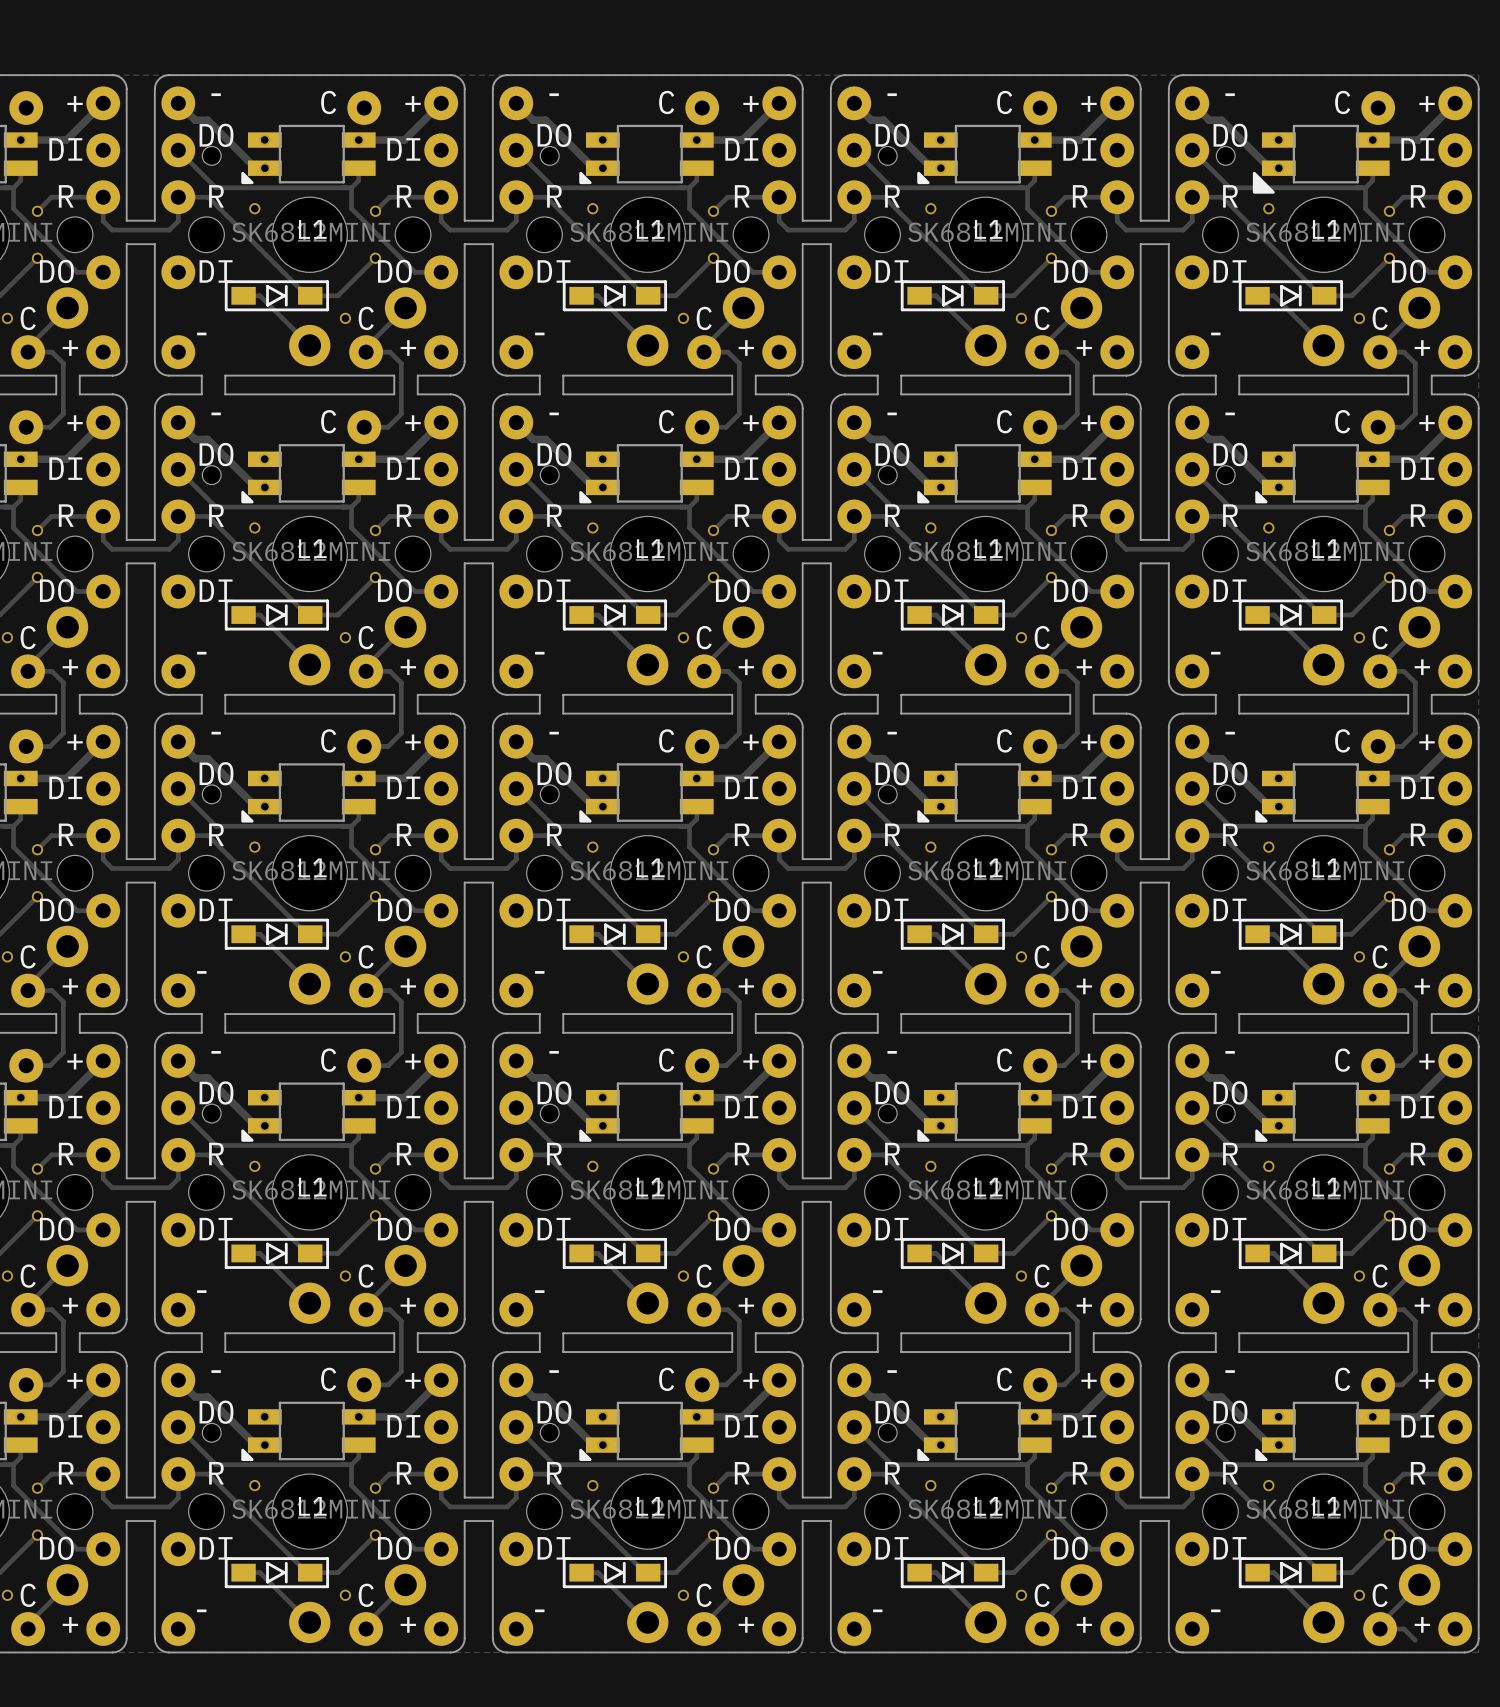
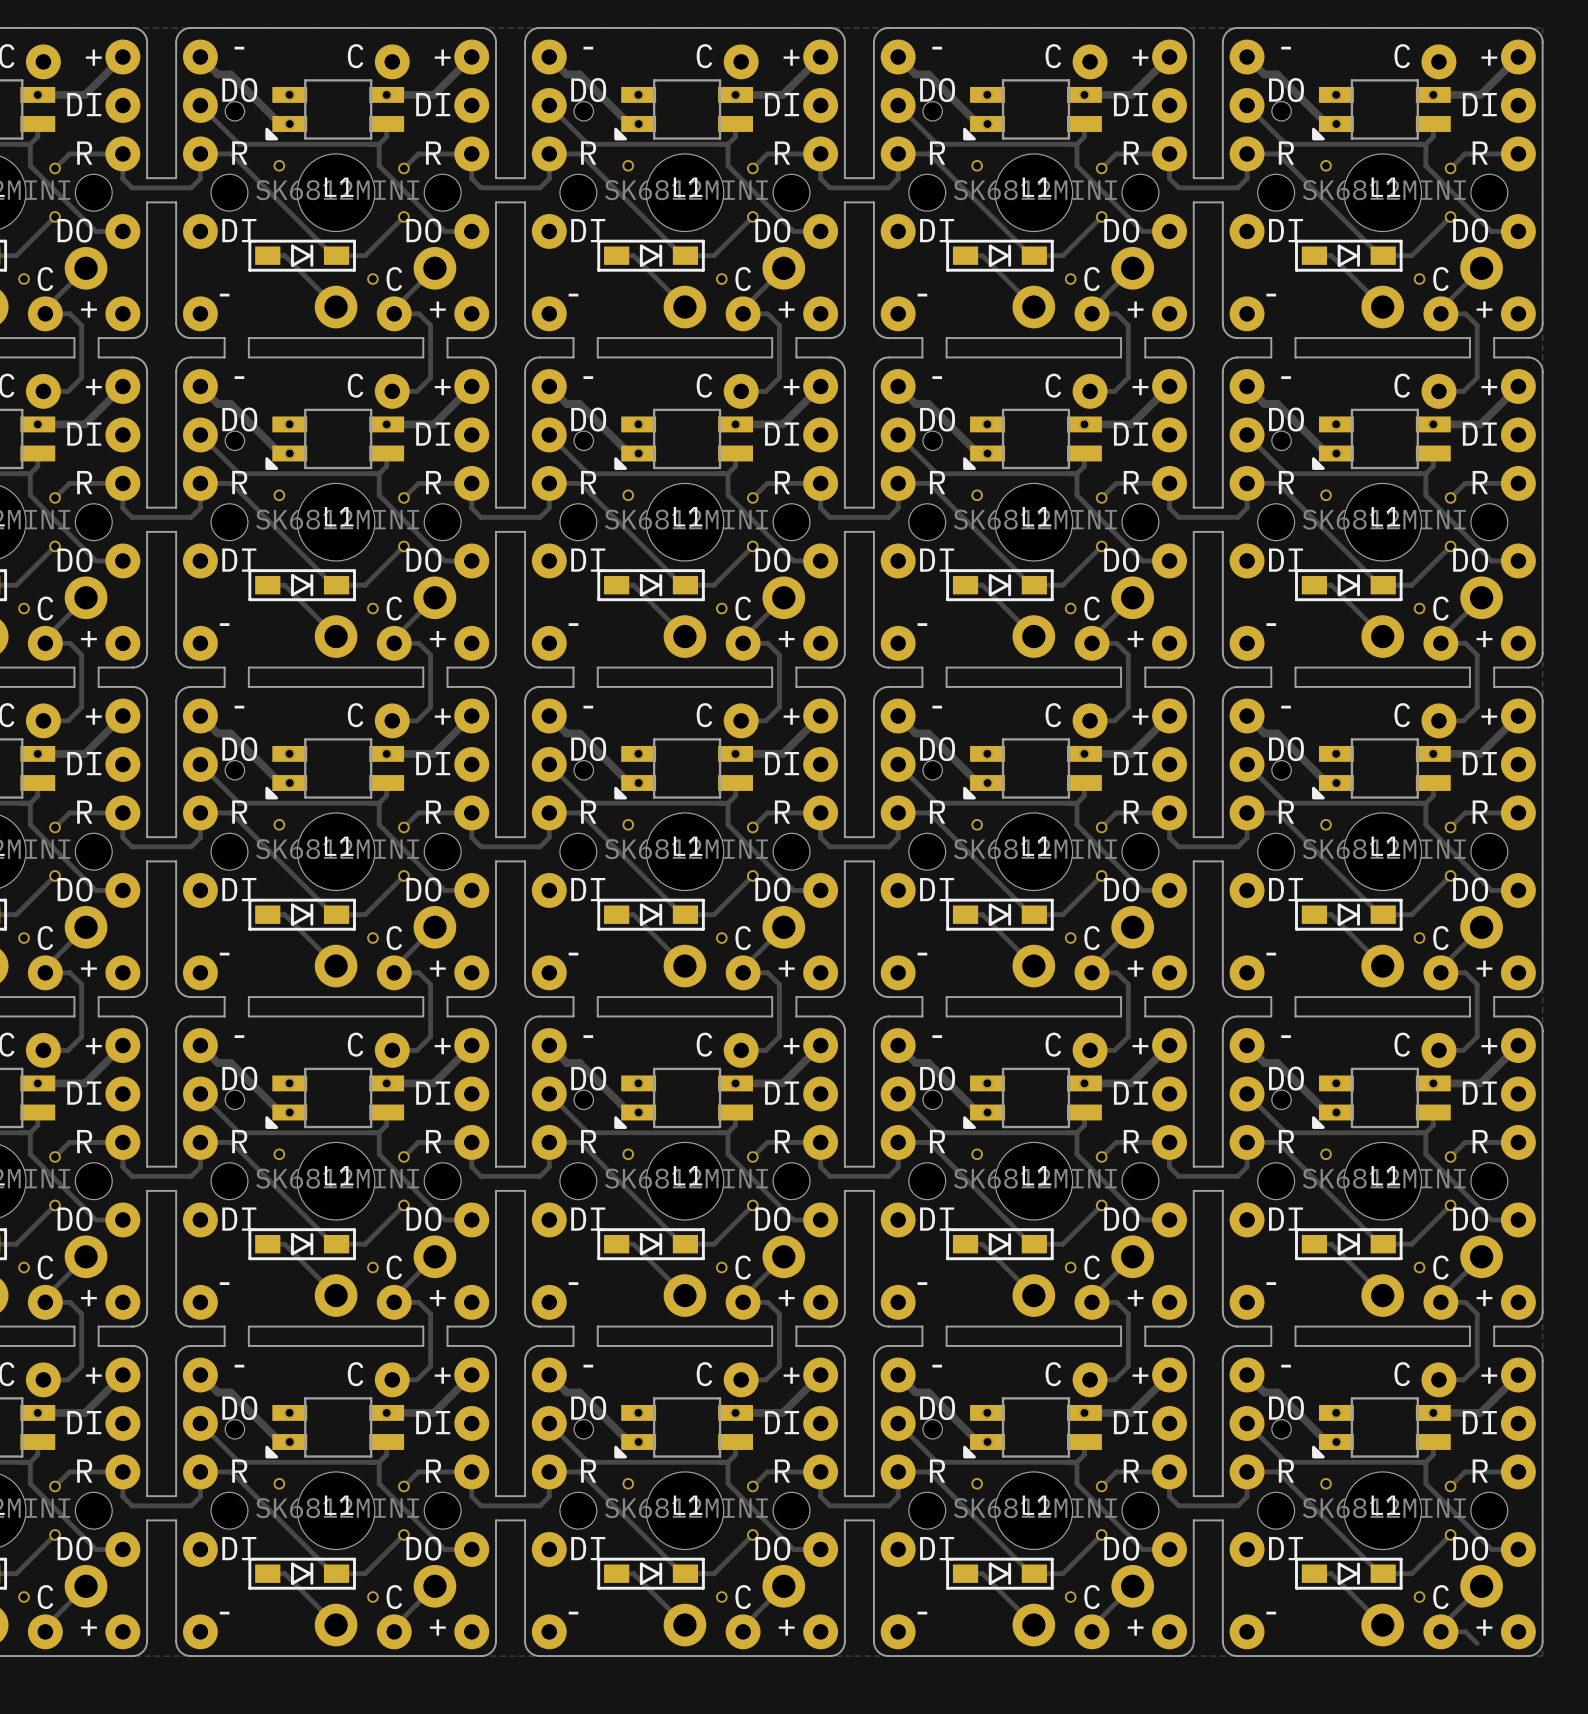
L1 footprint: [1252, 124, 1390, 194] -> [1312, 79, 1451, 141]

